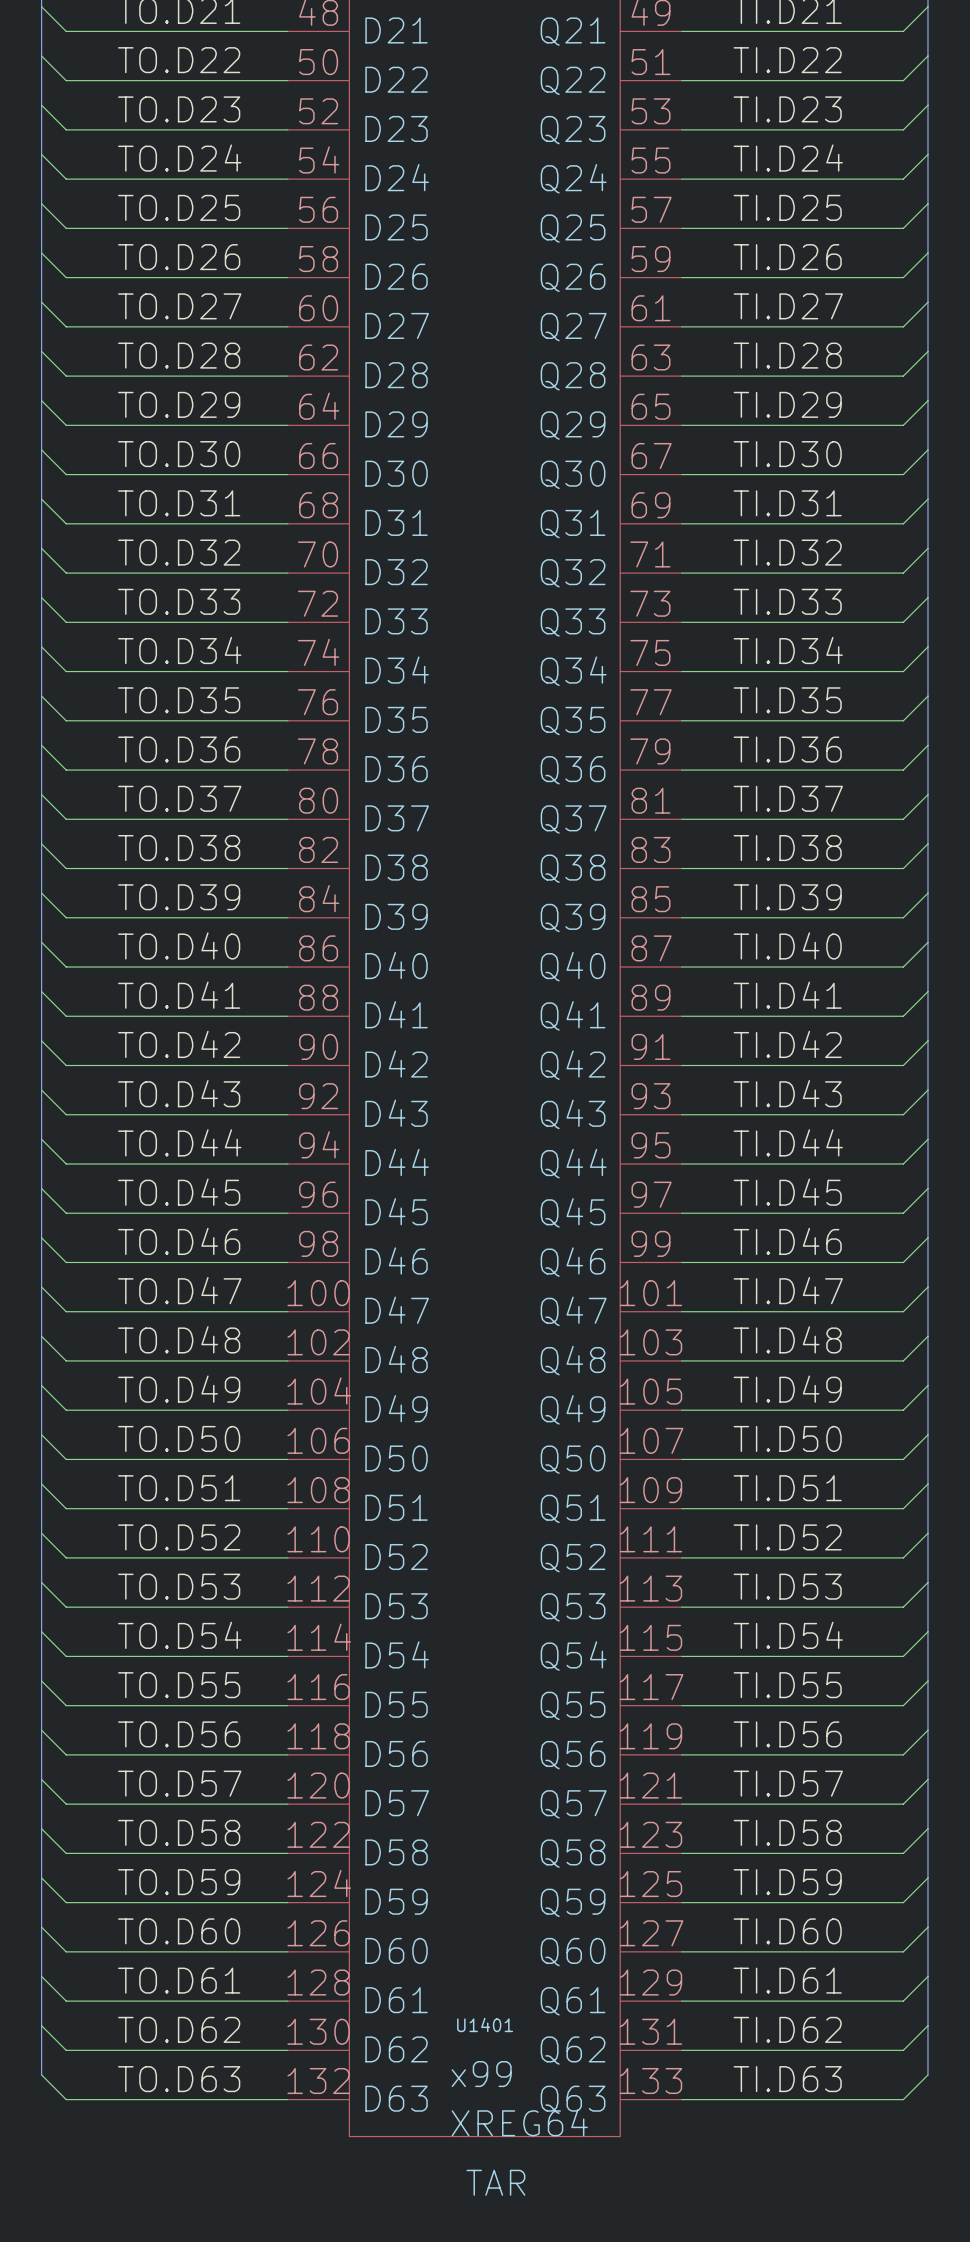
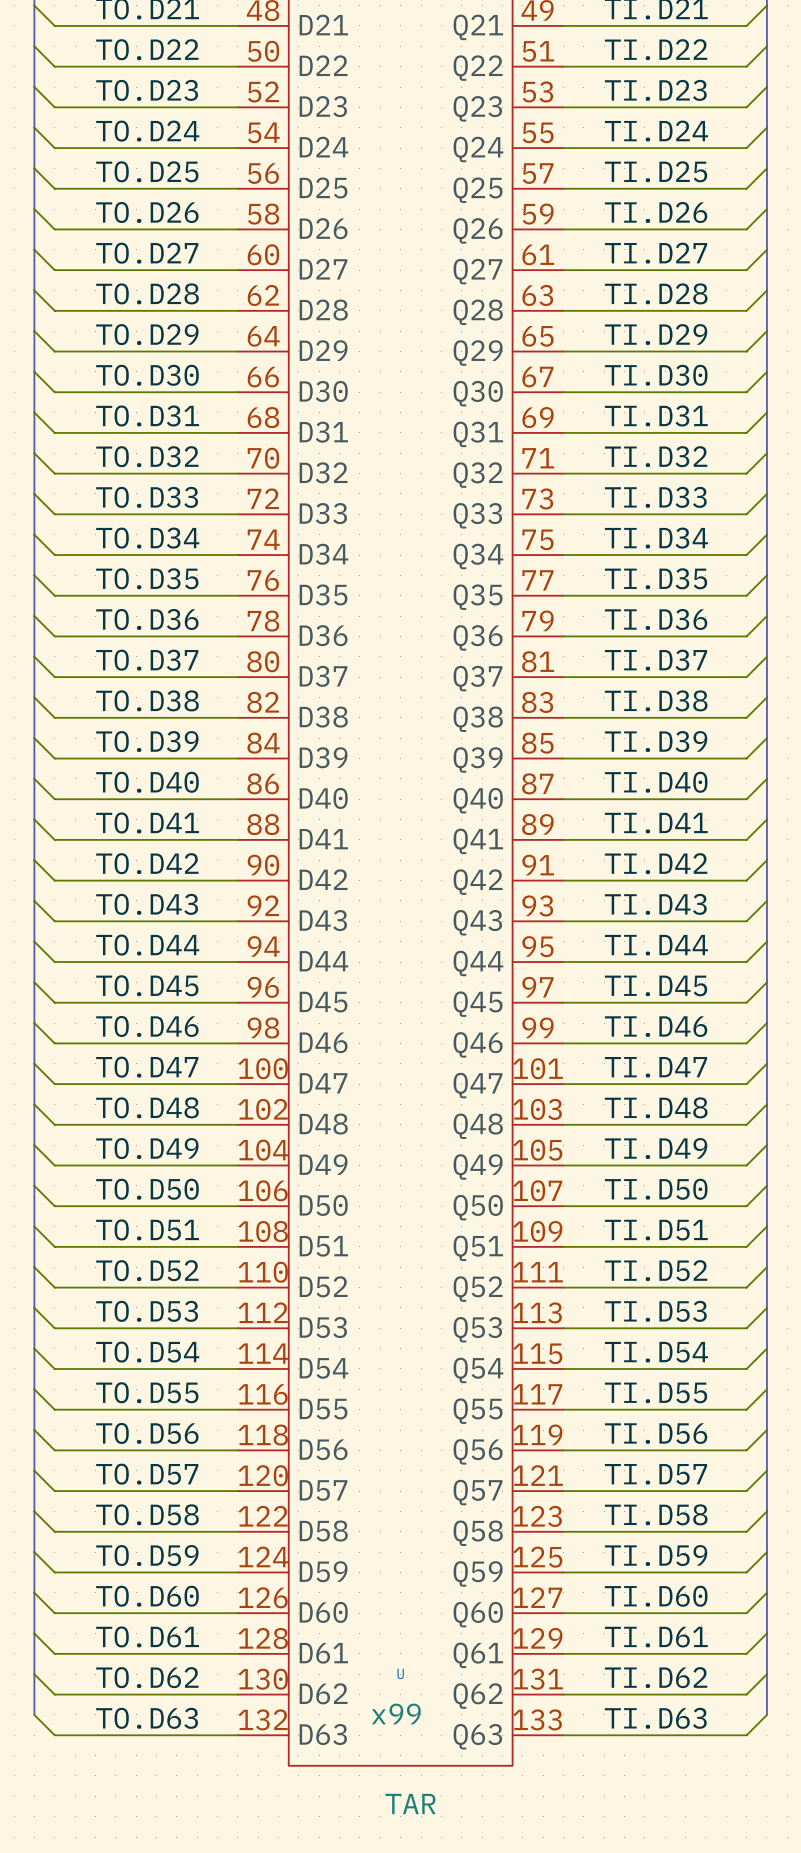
U1401 name: U1401 (485, 2024) -> U (400, 1673)
U1401 value: XREG64 (519, 2122) -> none

